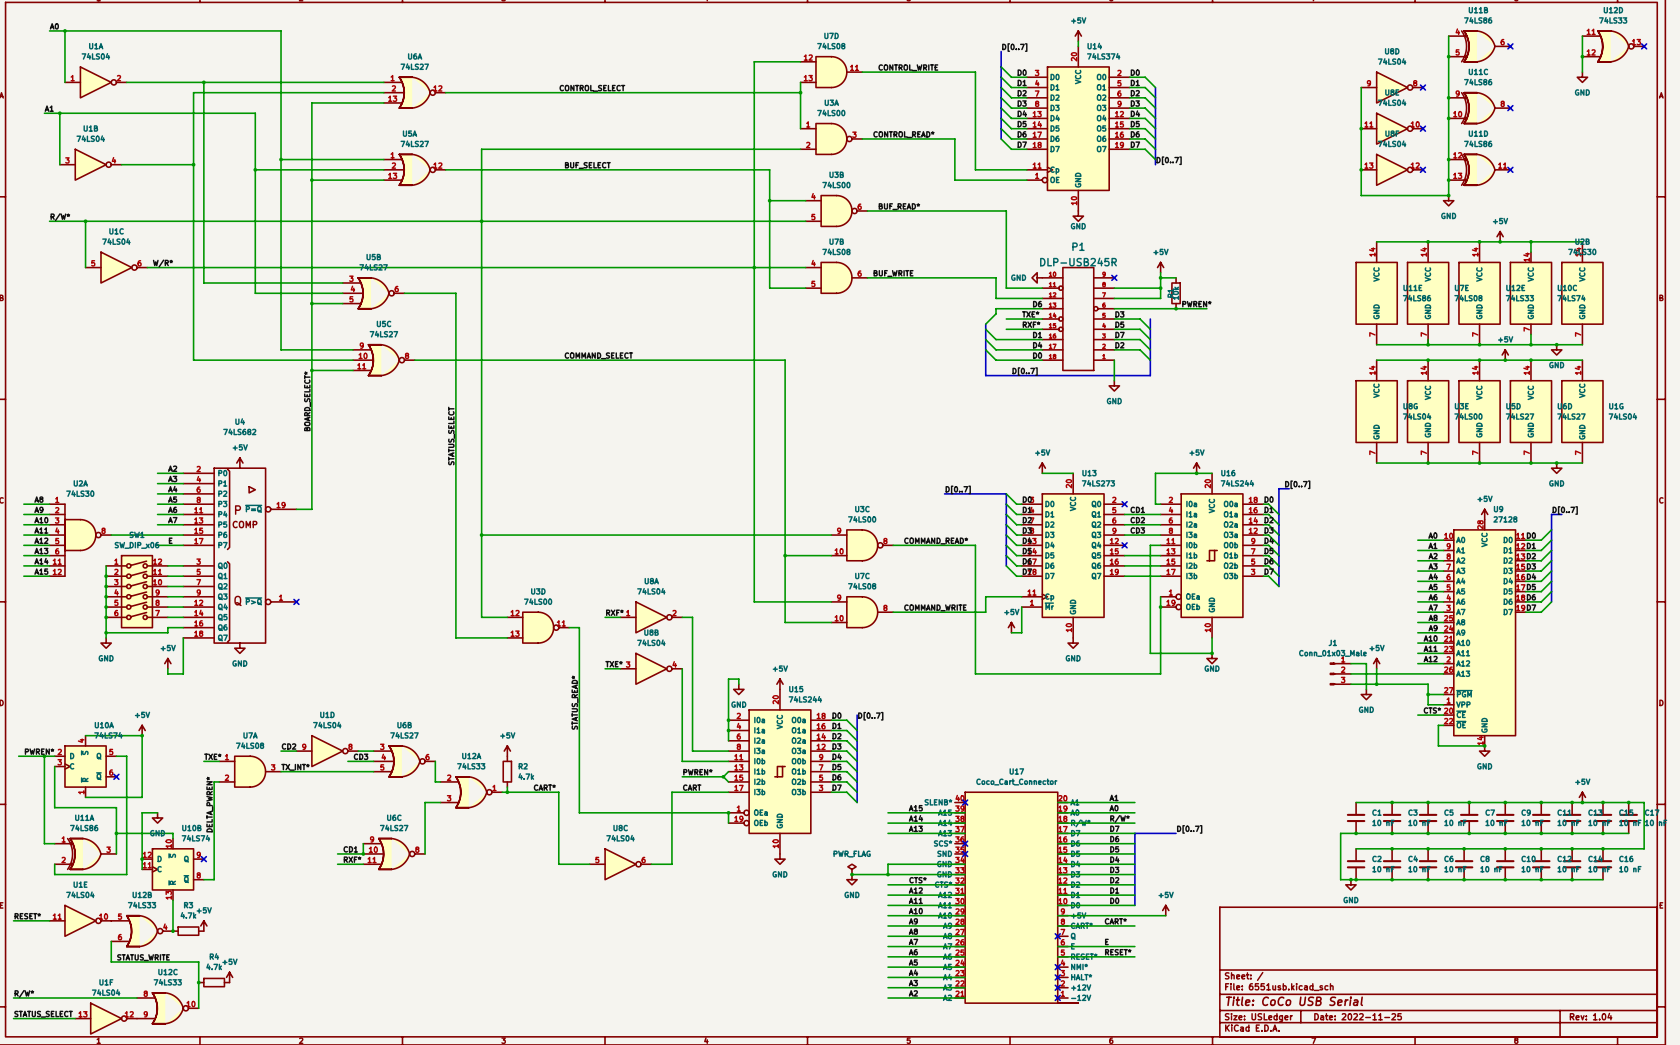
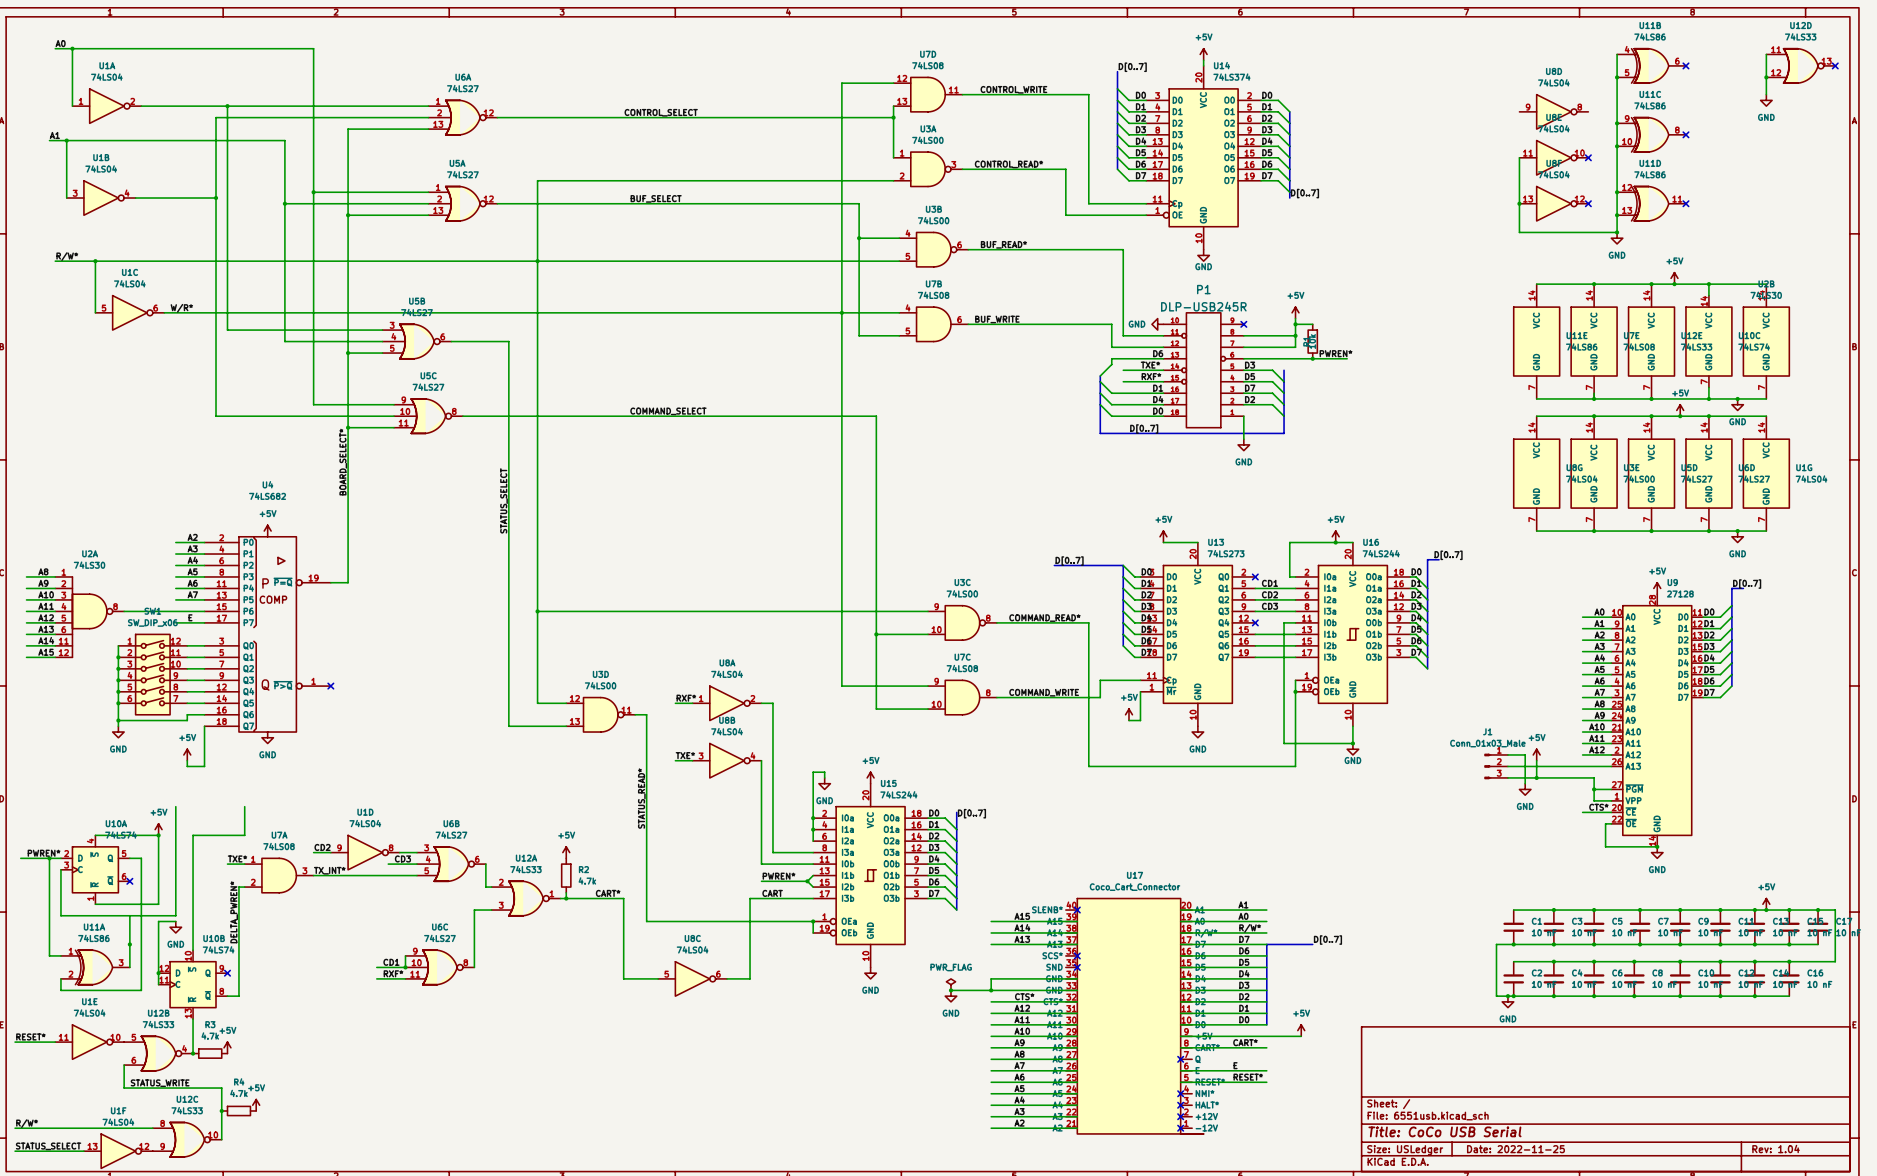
wire: (1361, 87) (1361, 128) -> none
no-connect mark: (1422, 87) -> none
junction: (1361, 128) -> none
wire: none -> (175, 806) (175, 915) (129, 915)
wire: (116, 833) (172, 833) -> (244, 806) (244, 835) (193, 835) (193, 944)

